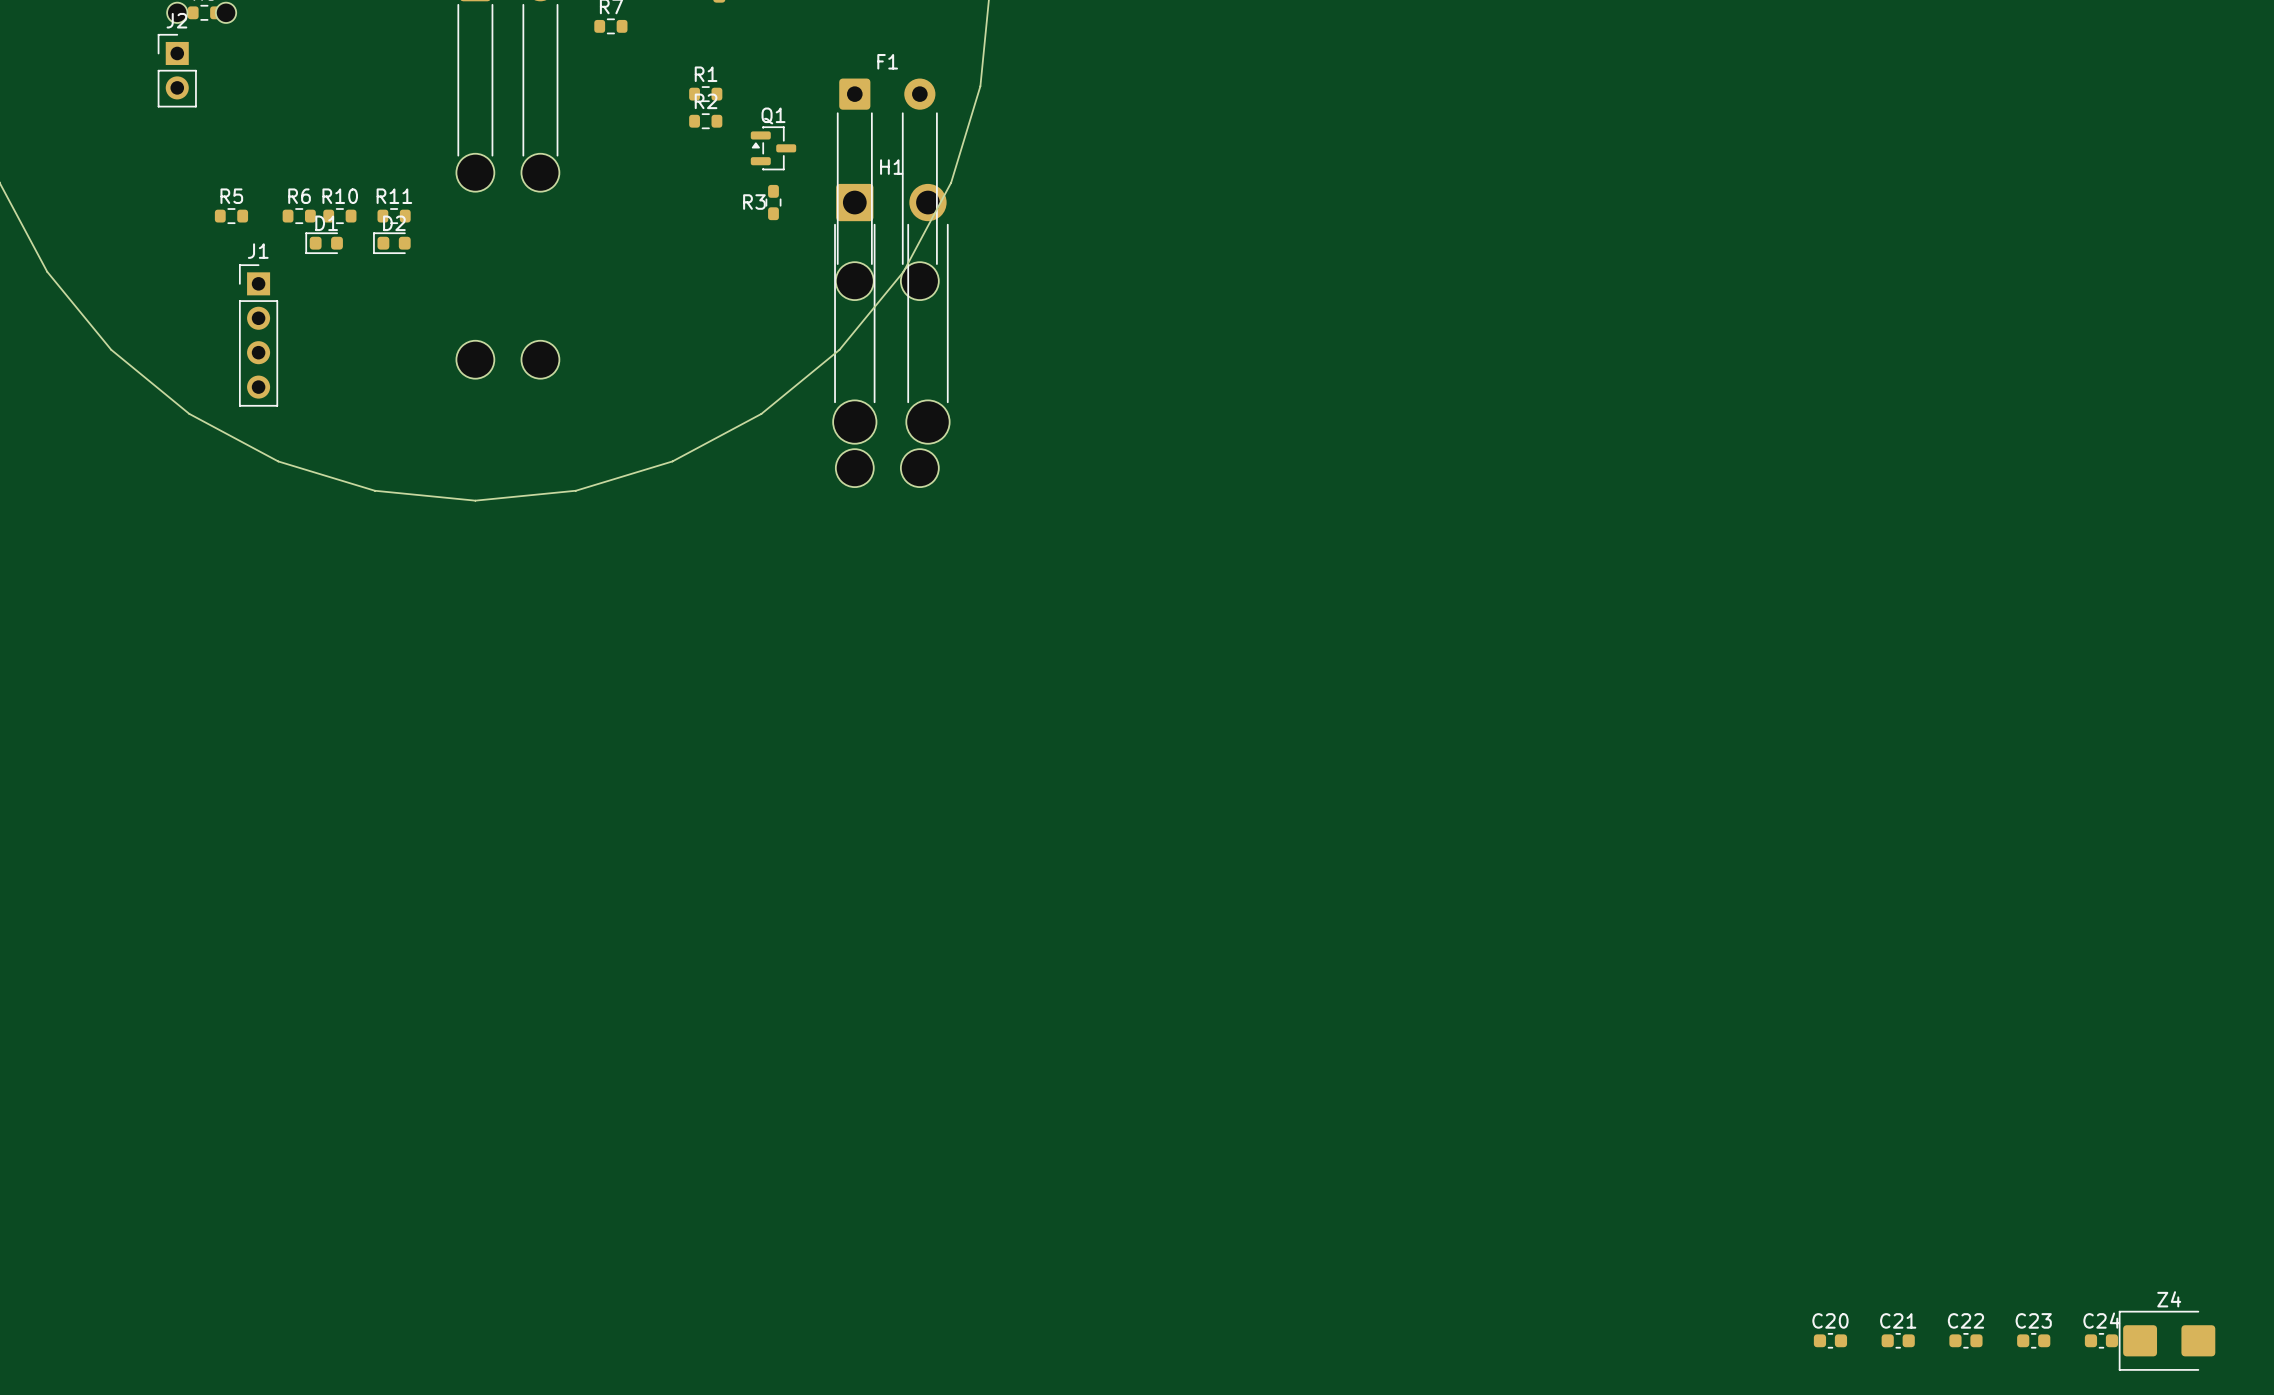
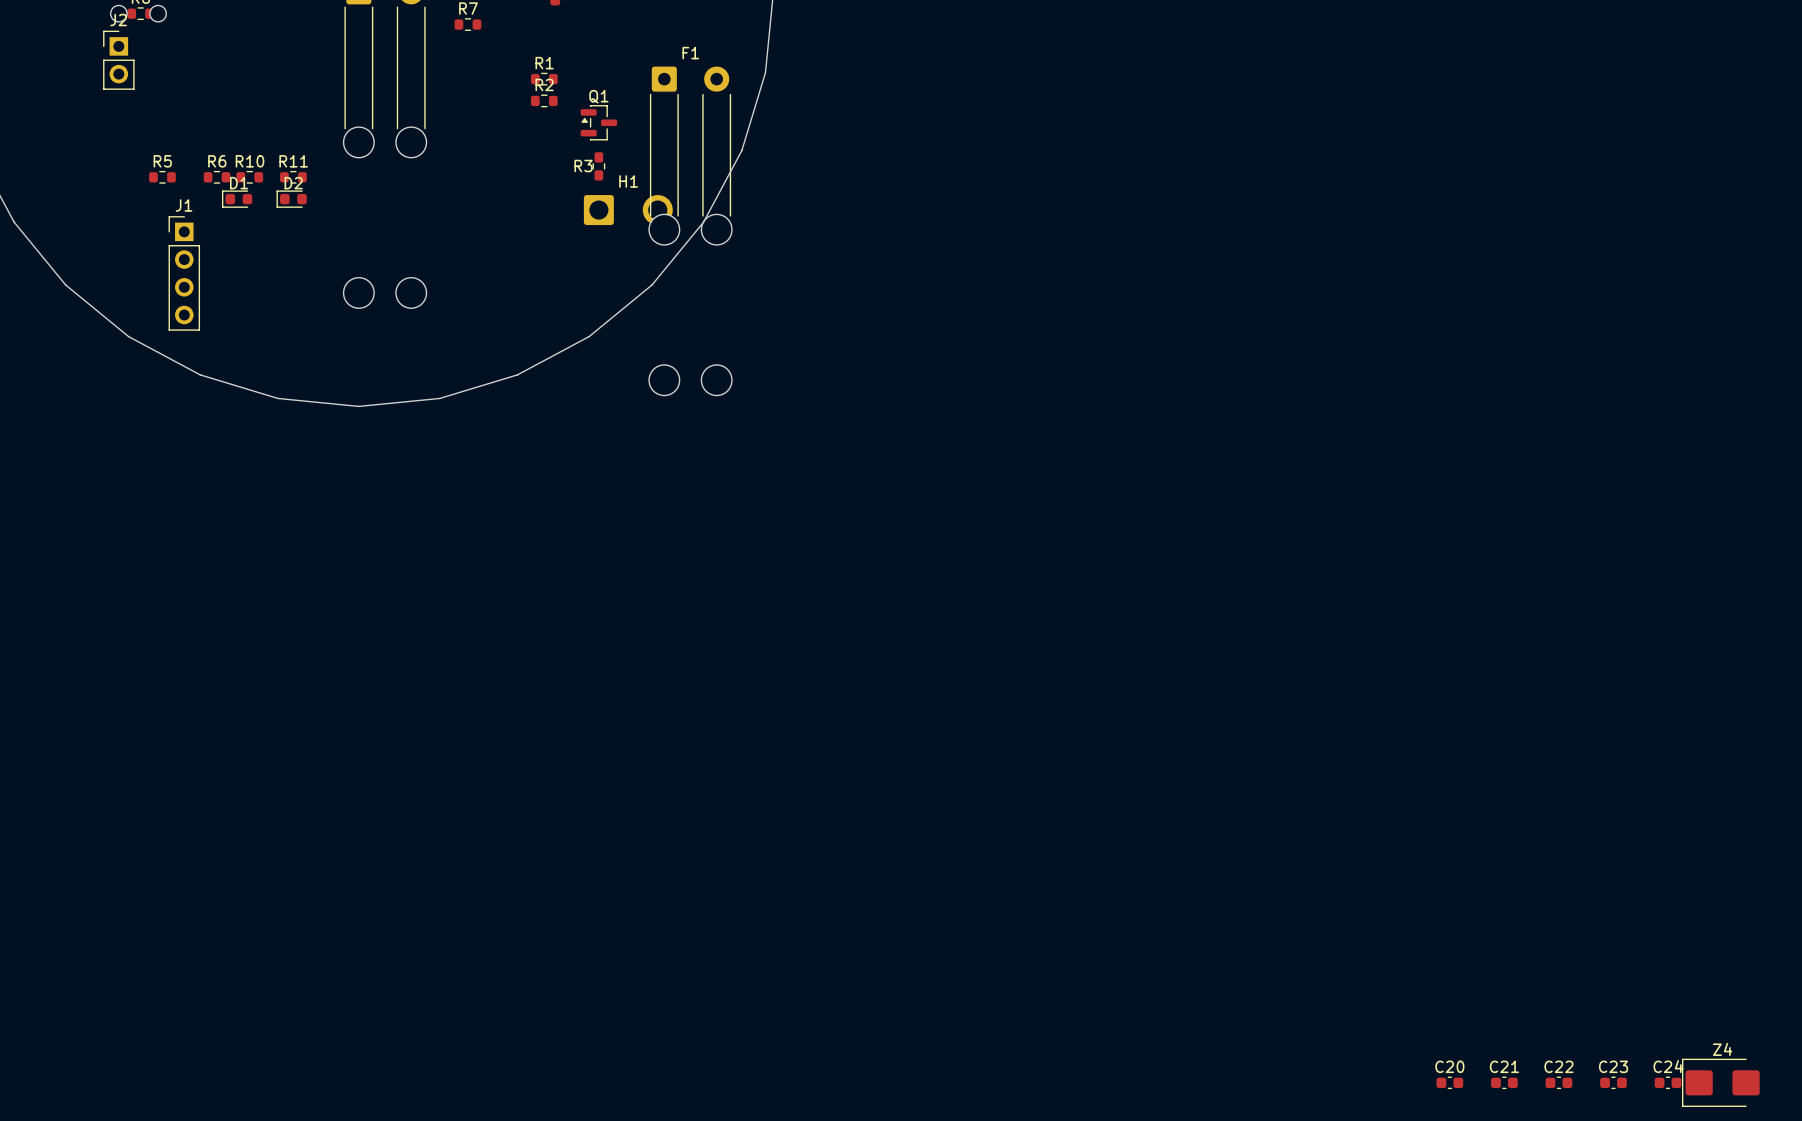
H1 name position: H1 (891, 167) -> H1 (628, 181)
H1 footprint: [833, 183, 950, 444] -> [583, 195, 673, 226]

